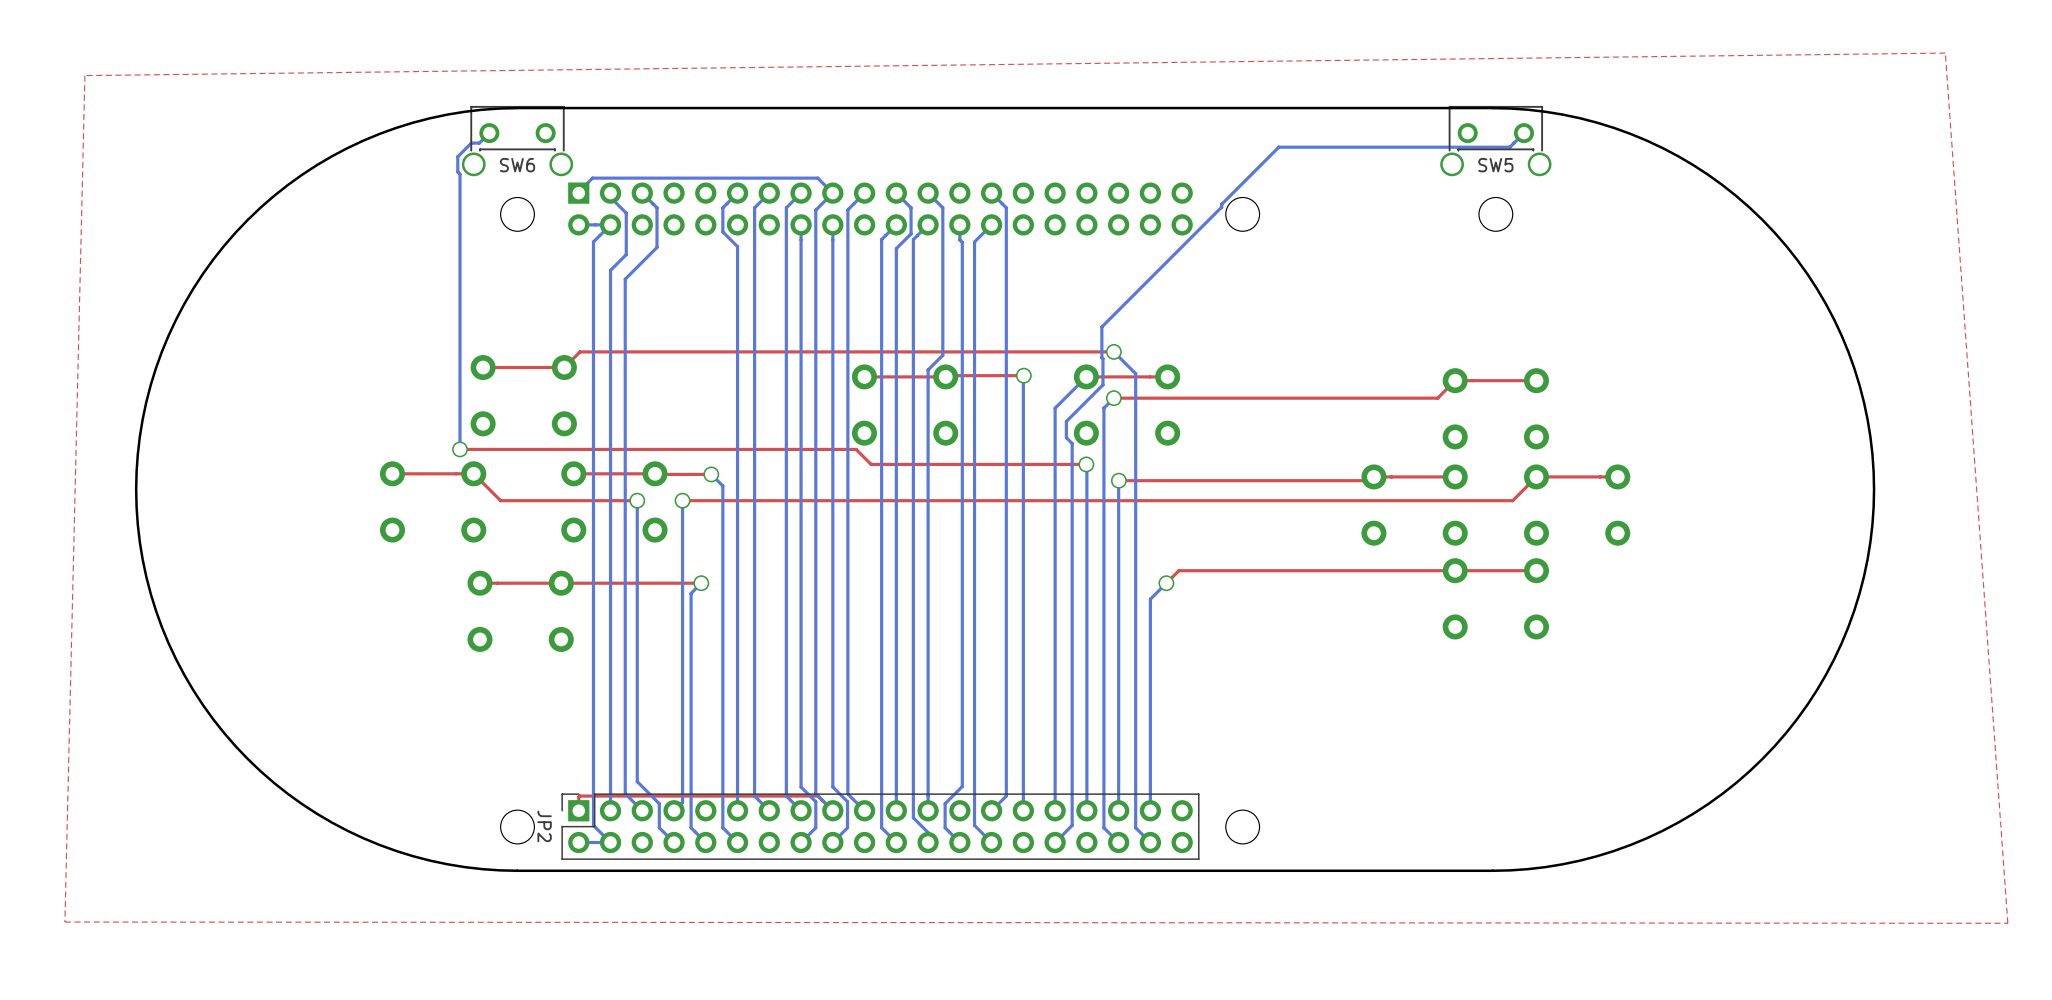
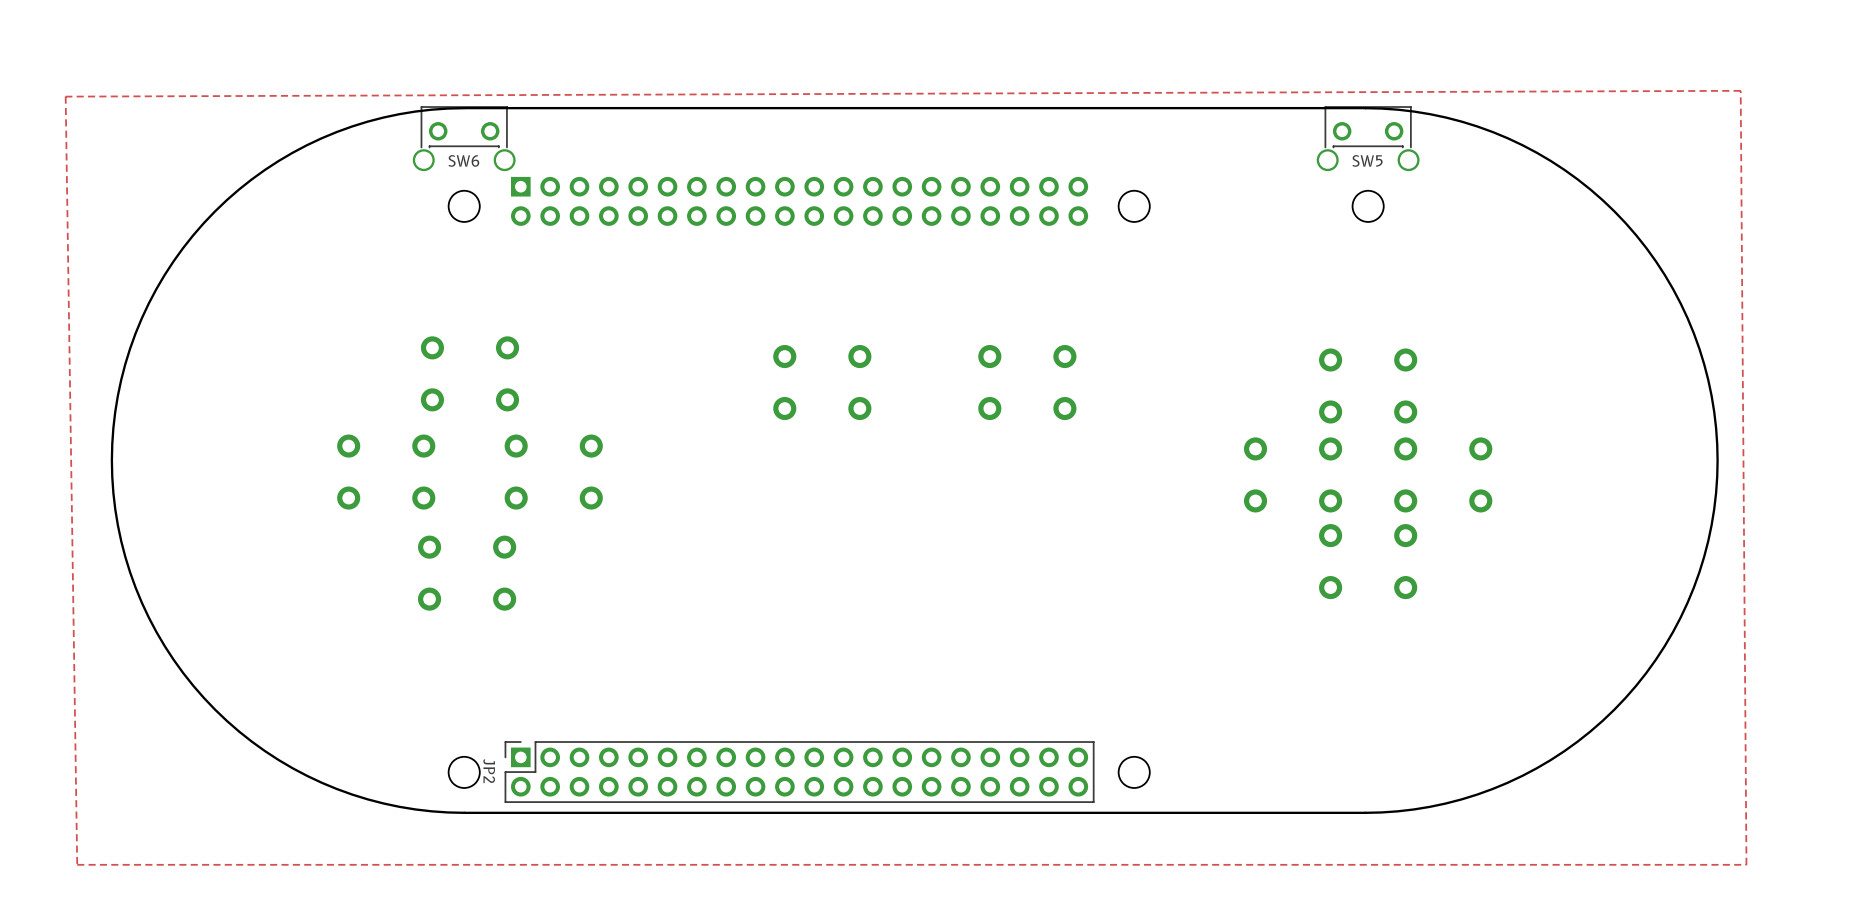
top zone outline: (1945, 53) (2007, 923) (64, 922) (84, 75) (1945, 53) -> (1740, 90) (1746, 864) (77, 864) (65, 96) (1740, 90)
bottom track: (489, 133) (479, 143) (471, 143) (457, 156) (457, 172) (459, 174) (459, 449) -> none
bottom track: (1523, 133) (1509, 147) (1278, 147) (1101, 326) (1102, 384) (1066, 421) (1066, 437) (1072, 443) (1072, 825) (1055, 842) -> none
bottom track: (578, 193) (592, 178) (817, 178) (832, 193) (815, 210) (815, 793) (832, 810) -> none
bottom track: (610, 193) (610, 197) (626, 213) (626, 254) (610, 270) (610, 810) -> none
bottom track: (642, 193) (657, 207) (657, 247) (625, 279) (625, 793) (642, 810) -> none
bottom track: (737, 193) (722, 207) (722, 231) (737, 246) (737, 810) -> none
bottom track: (769, 193) (754, 207) (754, 796) (769, 810) -> none
bottom track: (801, 193) (786, 207) (786, 796) (801, 810) -> none
bottom track: (864, 193) (847, 209) (847, 794) (864, 810) -> none
bottom track: (896, 193) (911, 207) (911, 233) (896, 248) (896, 810) -> none
bottom track: (928, 193) (942, 207) (942, 355) (928, 369) (928, 810) -> none
bottom track: (991, 193) (1006, 207) (1006, 796) (991, 810) -> none
bottom track: (578, 224) (610, 224) (593, 241) (593, 825) (610, 842) (578, 842) -> none
bottom track: (801, 224) (801, 787) (815, 801) (815, 827) (801, 842) -> none
bottom track: (832, 224) (832, 787) (847, 801) (847, 827) (832, 842) -> none
bottom track: (896, 224) (881, 239) (881, 827) (896, 842) -> none
bottom track: (928, 224) (913, 239) (913, 817) (928, 832) (928, 842) -> none
bottom track: (959, 224) (959, 239) (962, 242) (962, 786) (945, 803) (945, 827) (959, 842) -> none
bottom track: (991, 224) (974, 241) (974, 825) (991, 842) -> none
bottom track: (1113, 351) (1135, 373) (1135, 827) (1150, 842) -> none
top track: (1113, 351) (580, 351) (564, 367) (483, 367) -> none
via: (1113, 351) -> none
bottom track: (1023, 375) (1023, 810) -> none
top track: (1023, 375) (864, 376) -> none
via: (1023, 375) -> none
bottom track: (1086, 376) (1055, 408) (1055, 810) -> none
top track: (1167, 376) (1086, 376) -> none
top track: (1536, 380) (1455, 380) (1437, 398) (1113, 398) -> none
bottom track: (1113, 398) (1103, 408) (1103, 827) (1118, 842) -> none
via: (1113, 398) -> none
top track: (459, 449) (856, 449) (871, 464) (1086, 464) -> none
via: (459, 449) -> none
bottom track: (1086, 464) (1086, 810) -> none
via: (1086, 464) -> none
top track: (392, 473) (473, 473) (500, 500) (637, 500) -> none
top track: (573, 473) (711, 474) -> none
bottom track: (711, 474) (722, 485) (722, 827) (737, 842) -> none
via: (711, 474) -> none
top track: (1455, 476) (1373, 476) (1370, 480) (1118, 480) -> none
top track: (1617, 476) (1536, 476) (1512, 500) (682, 500) -> none
bottom track: (1118, 480) (1118, 810) -> none
via: (1118, 480) -> none
bottom track: (637, 500) (637, 781) (659, 803) (659, 827) (674, 842) -> none
via: (637, 500) -> none
bottom track: (682, 500) (682, 802) (674, 810) -> none
via: (682, 500) -> none
top track: (1536, 570) (1178, 570) (1166, 583) -> none
bottom track: (701, 583) (691, 593) (691, 827) (705, 842) -> none
top track: (701, 583) (480, 583) -> none
via: (701, 583) -> none
bottom track: (1166, 583) (1150, 599) (1150, 810) -> none
via: (1166, 583) -> none
top track: (832, 810) (818, 796) (579, 796) (578, 810) -> none

